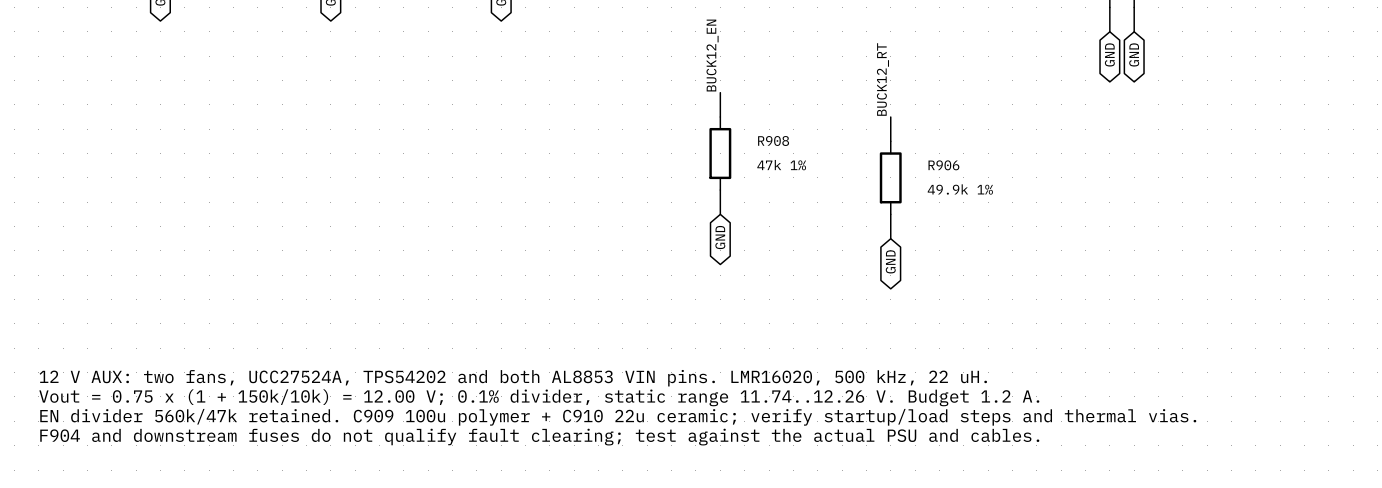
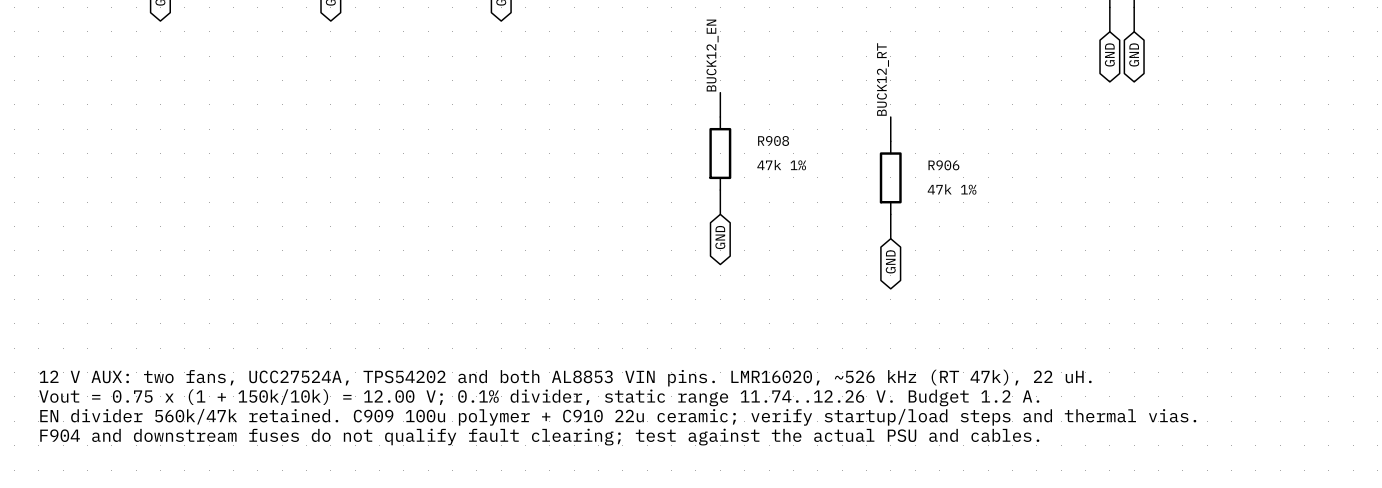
R906 value: 49.9k 1% (960, 189) -> 47k 1% (952, 189)
text: 12 V AUX: two fans, UCC27524A, TPS54202 and both AL8853 VIN pins. LMR16020, 500 kHz, 22 uH. (513, 378) -> 12 V AUX: two fans, UCC27524A, TPS54202 and both AL8853 VIN pins. LMR16020, ~526 kHz (RT 47k), 22 uH. (565, 378)

